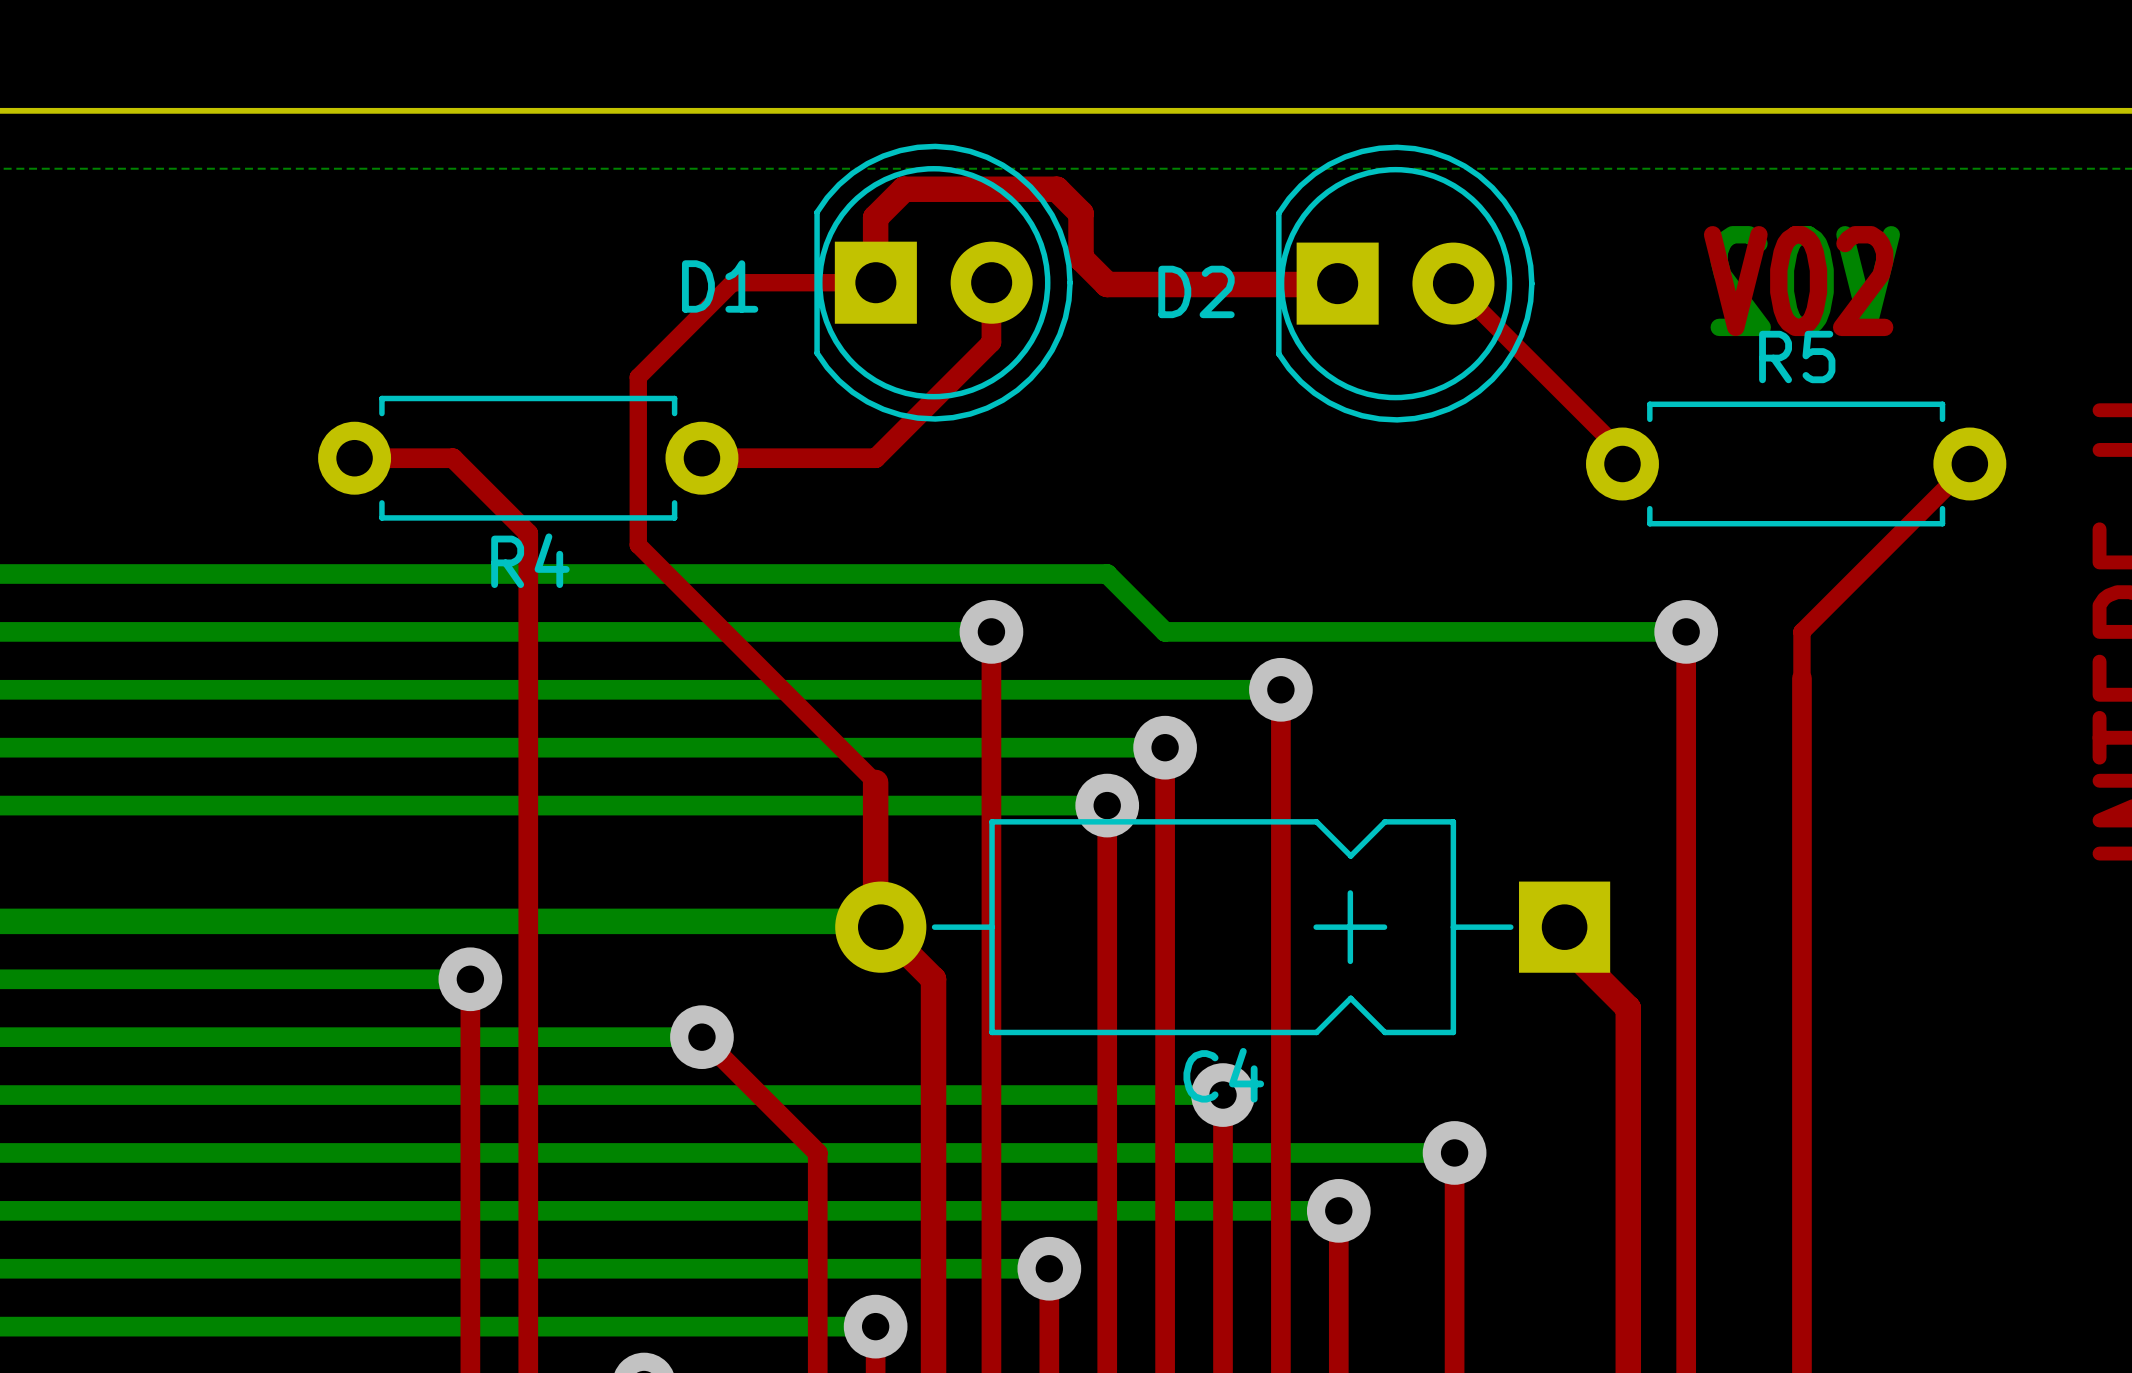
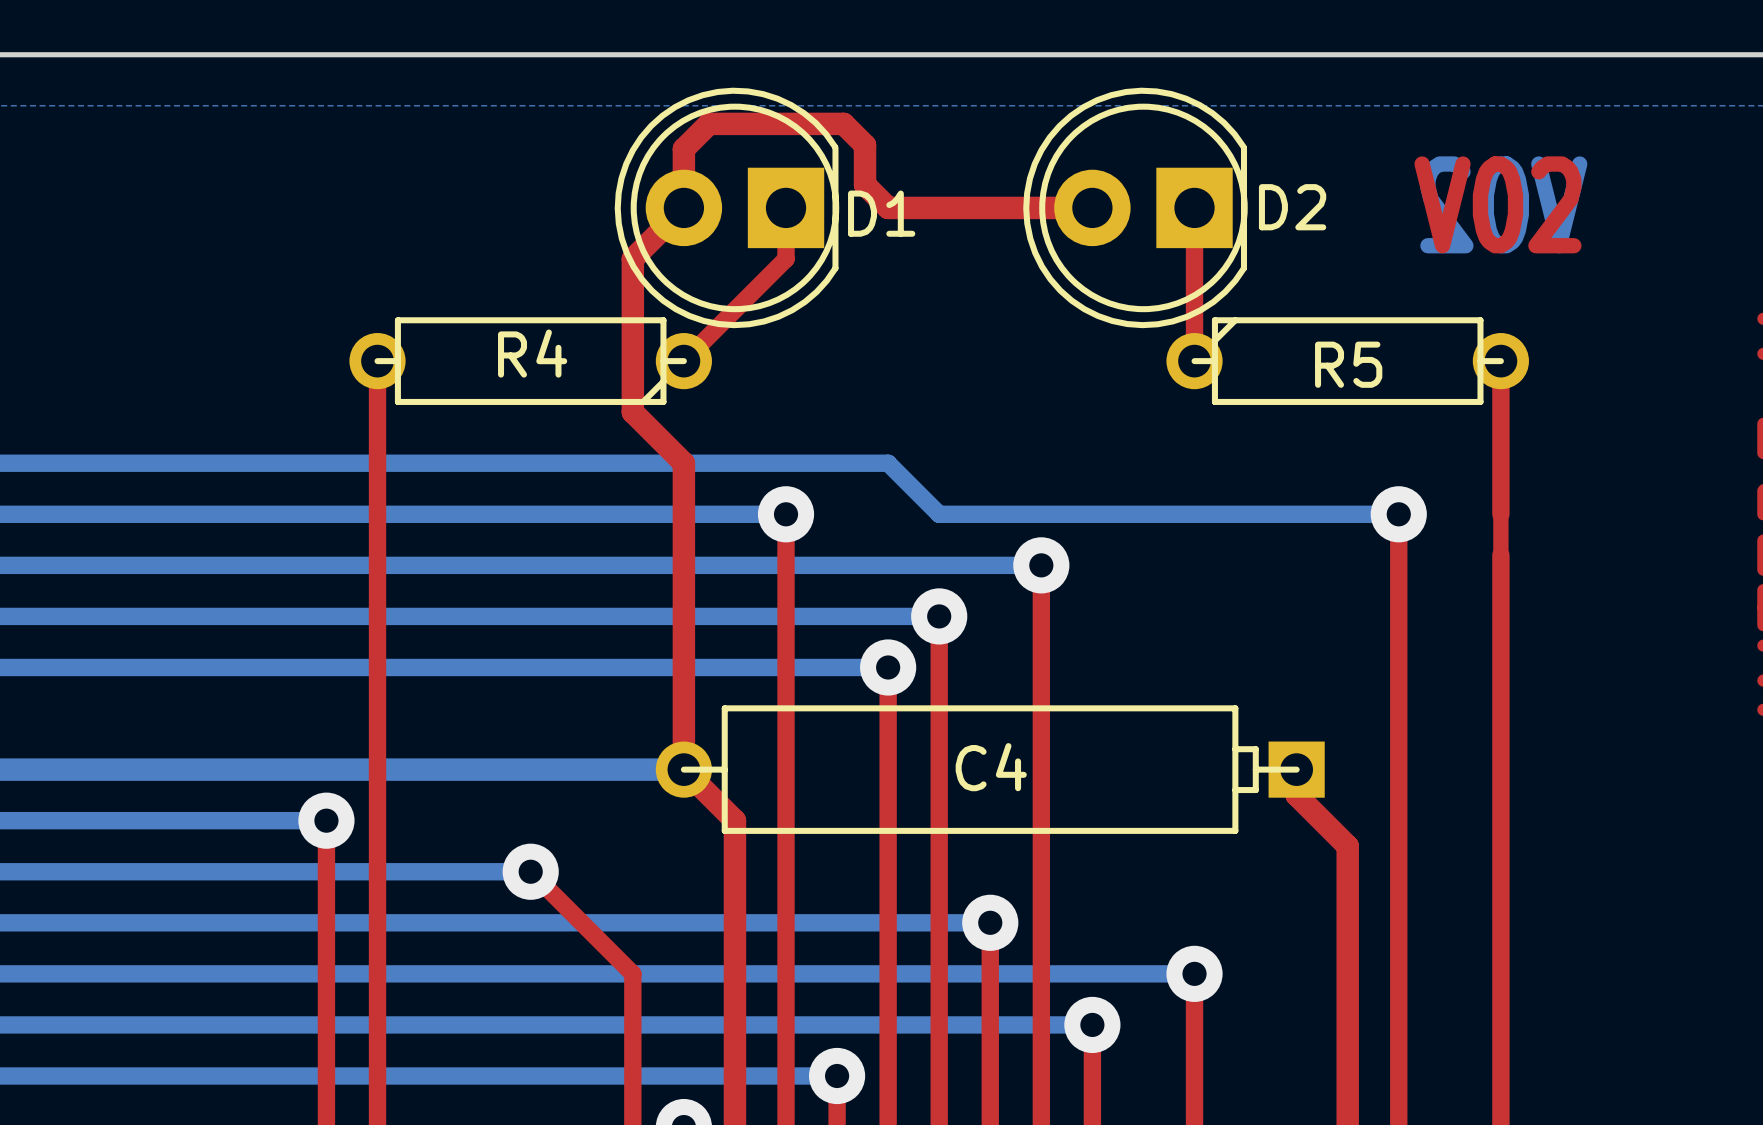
D1 footprint: [814, 143, 1073, 422] -> [614, 87, 840, 329]
D2 footprint: [1276, 144, 1535, 423] -> [1023, 87, 1248, 329]
top track: (875, 282) (732, 282) (638, 377) (638, 545) (875, 782) -> (683, 207) (632, 258) (632, 412) (683, 463) (683, 647)
top track: (1453, 283) (1622, 452) (1622, 464) -> (1194, 207) (1194, 361)
D1 name position: D1 (720, 286) -> D1 (881, 213)
D2 name position: D2 (1196, 291) -> D2 (1292, 207)
R5 name position: R5 (1797, 356) -> R5 (1348, 364)
R4 footprint: [318, 395, 739, 521] -> [349, 317, 712, 405]
R5 footprint: [1586, 401, 2007, 527] -> [1166, 317, 1529, 405]
top track: (354, 458) (453, 458) (528, 533) -> (377, 361) (377, 427)
top track: (701, 458) (875, 458) -> none
top track: (1969, 464) (1801, 631) -> (1500, 361) (1500, 514)
R4 name position: R4 (530, 560) -> R4 (532, 353)
C4 footprint: [835, 819, 1611, 1036] -> [655, 705, 1325, 834]
C4 name position: C4 (1223, 1075) -> C4 (991, 767)

